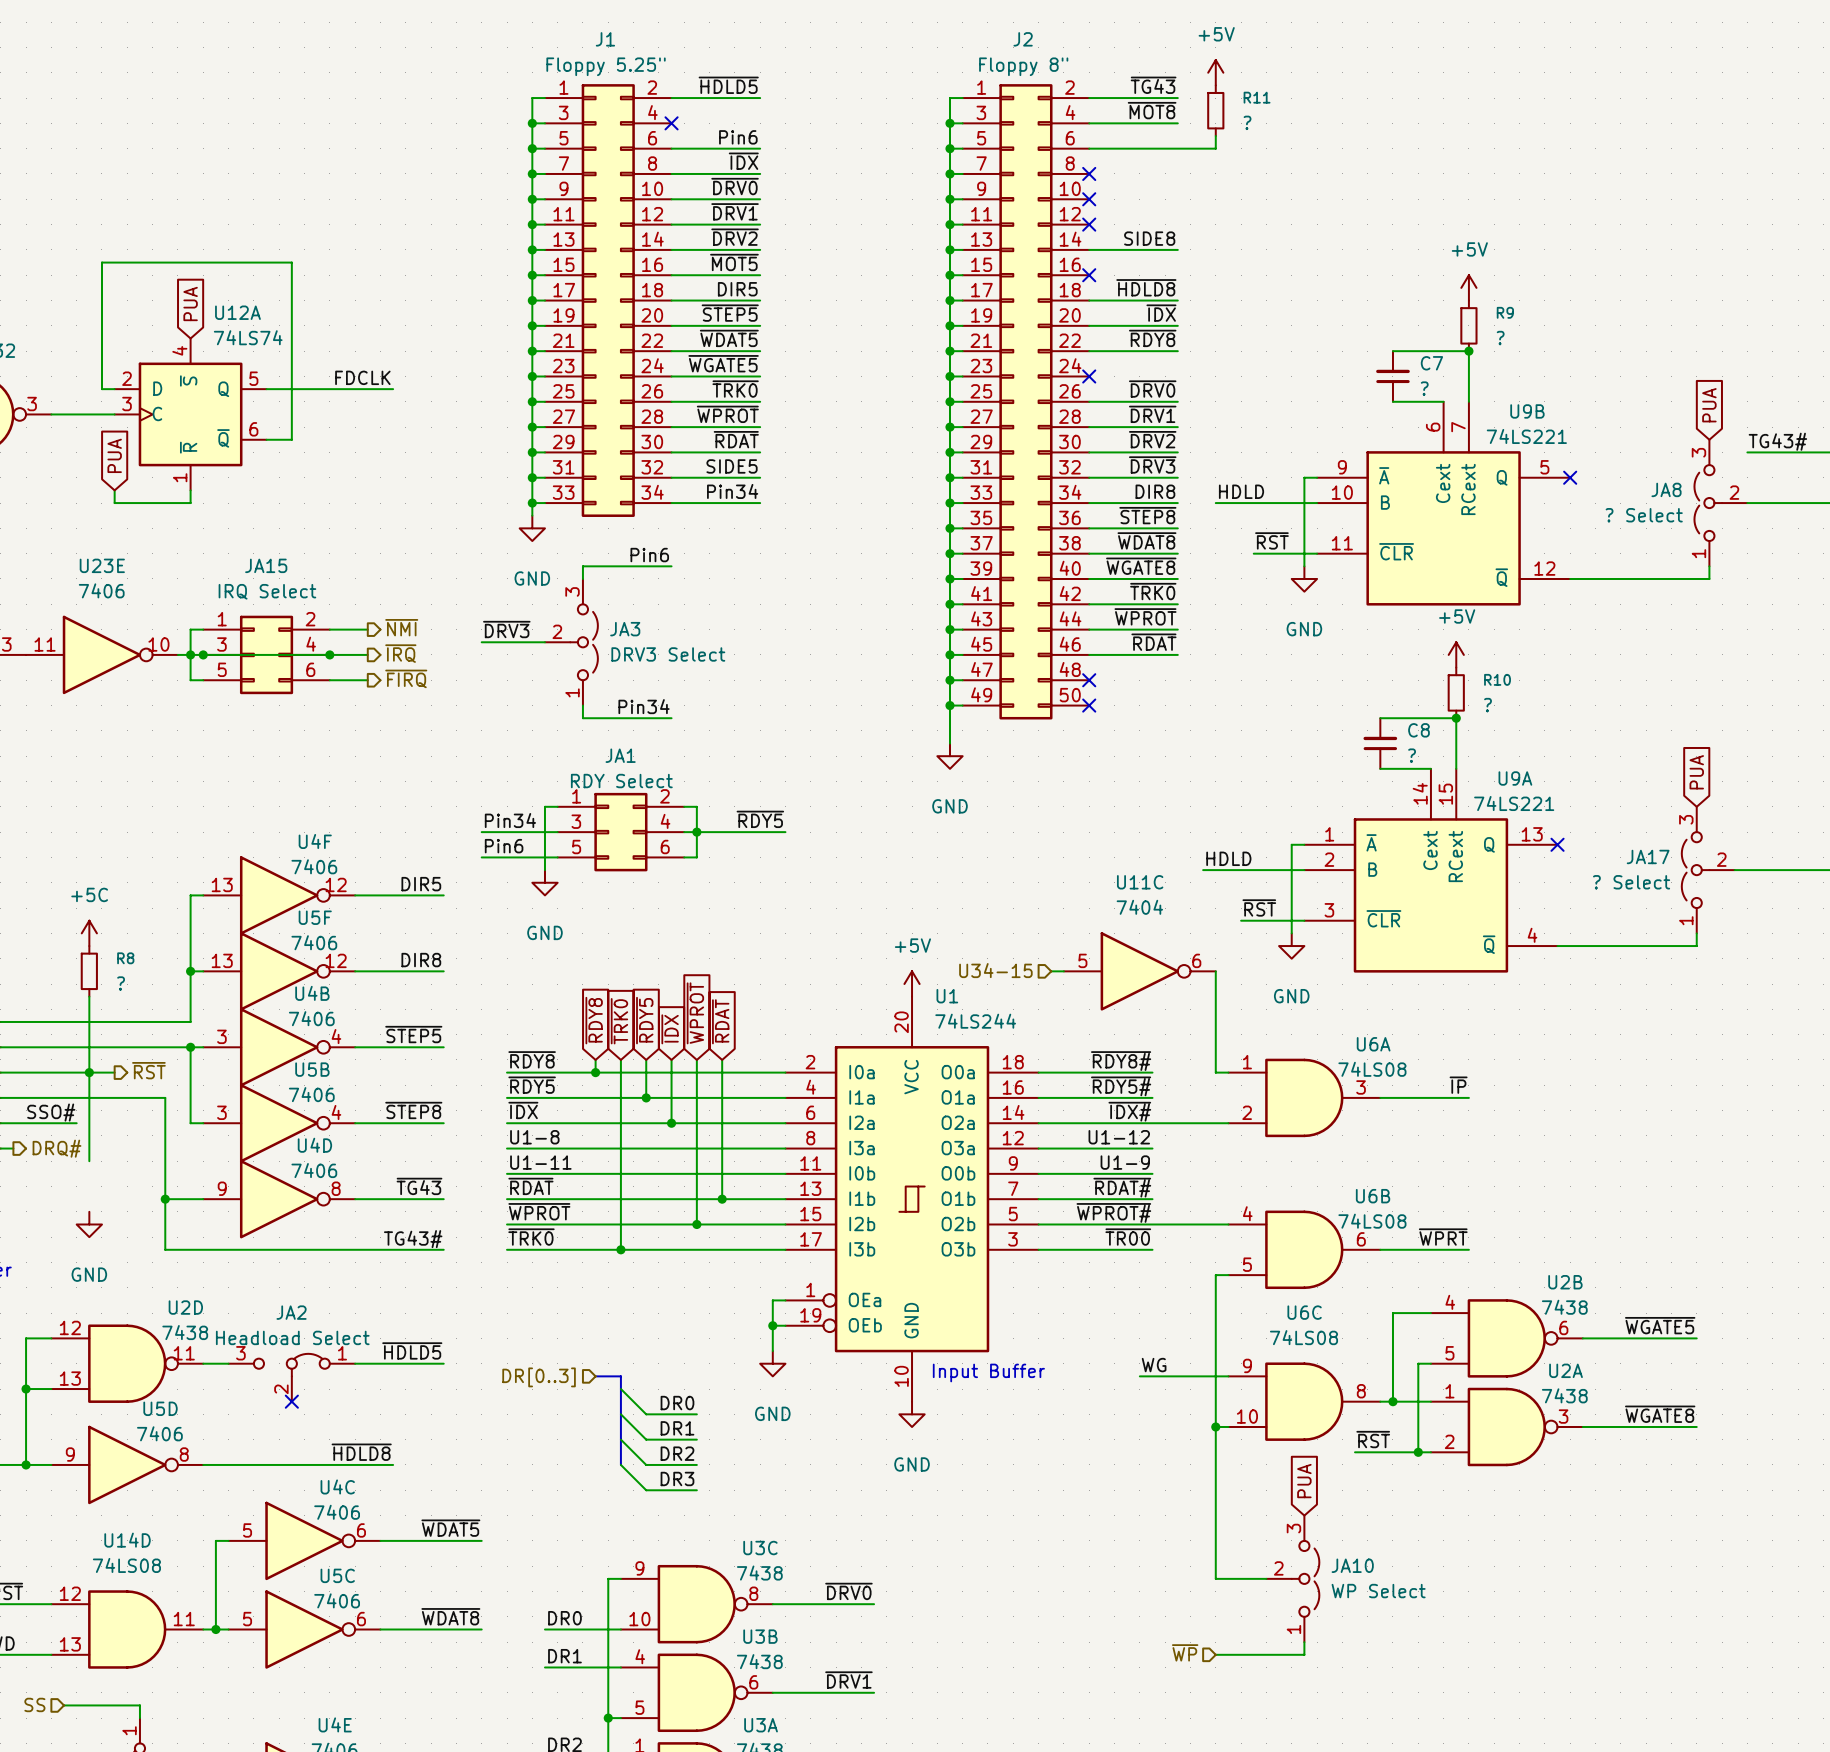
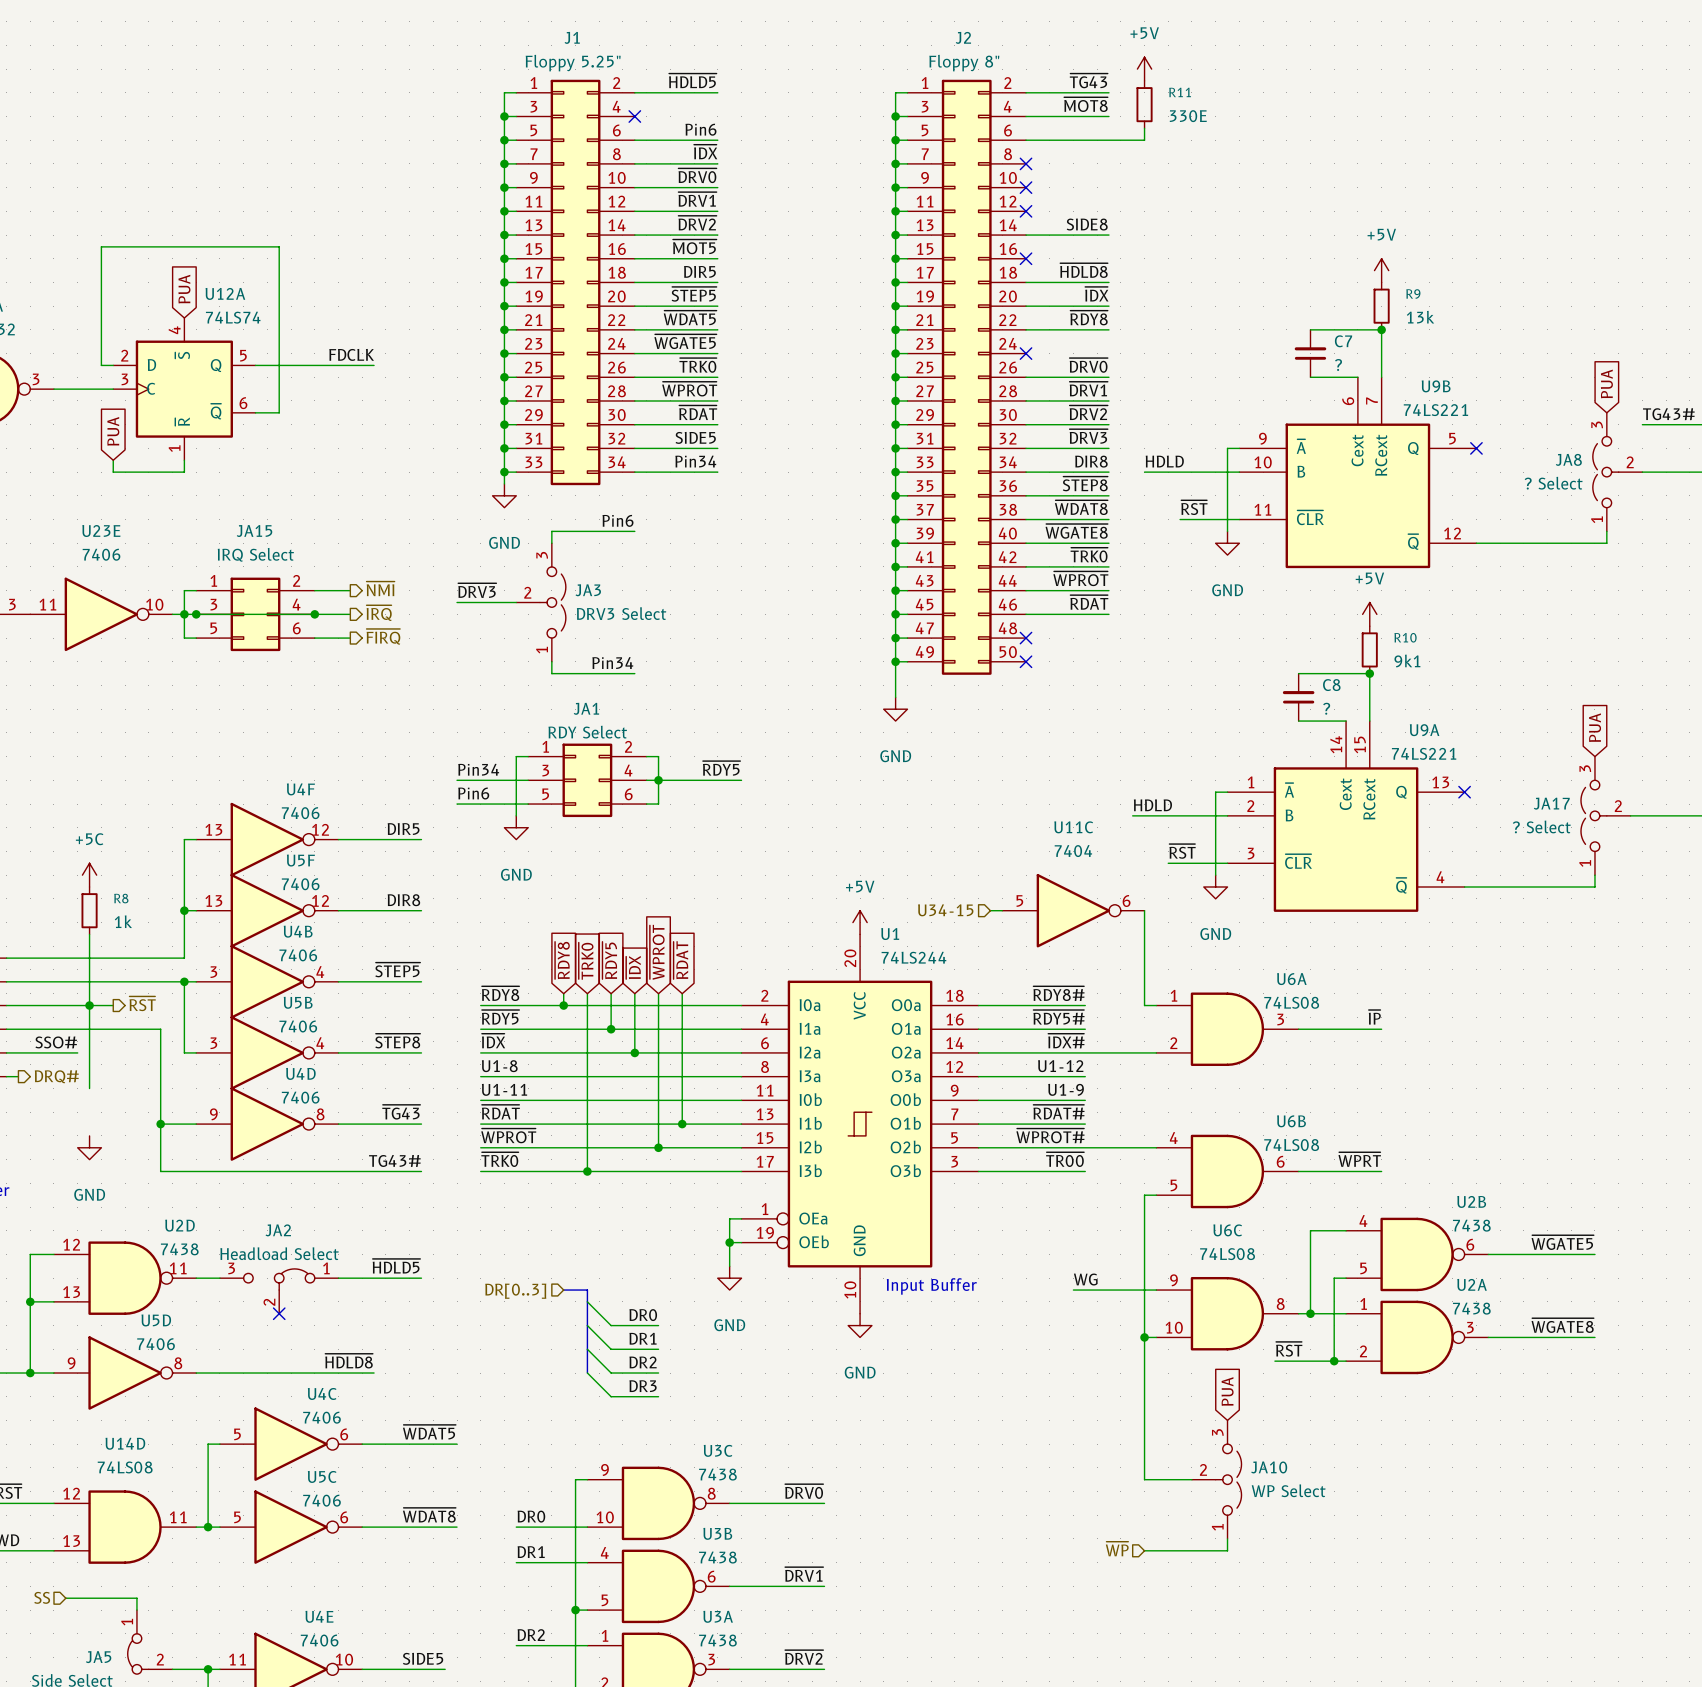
R11 value: ? (1247, 122) -> 330E (1188, 116)
R9 value: ? (1500, 338) -> 13k (1420, 317)
R10 value: ? (1488, 705) -> 9k1 (1407, 661)
R8 value: ? (121, 983) -> 1k (123, 921)

